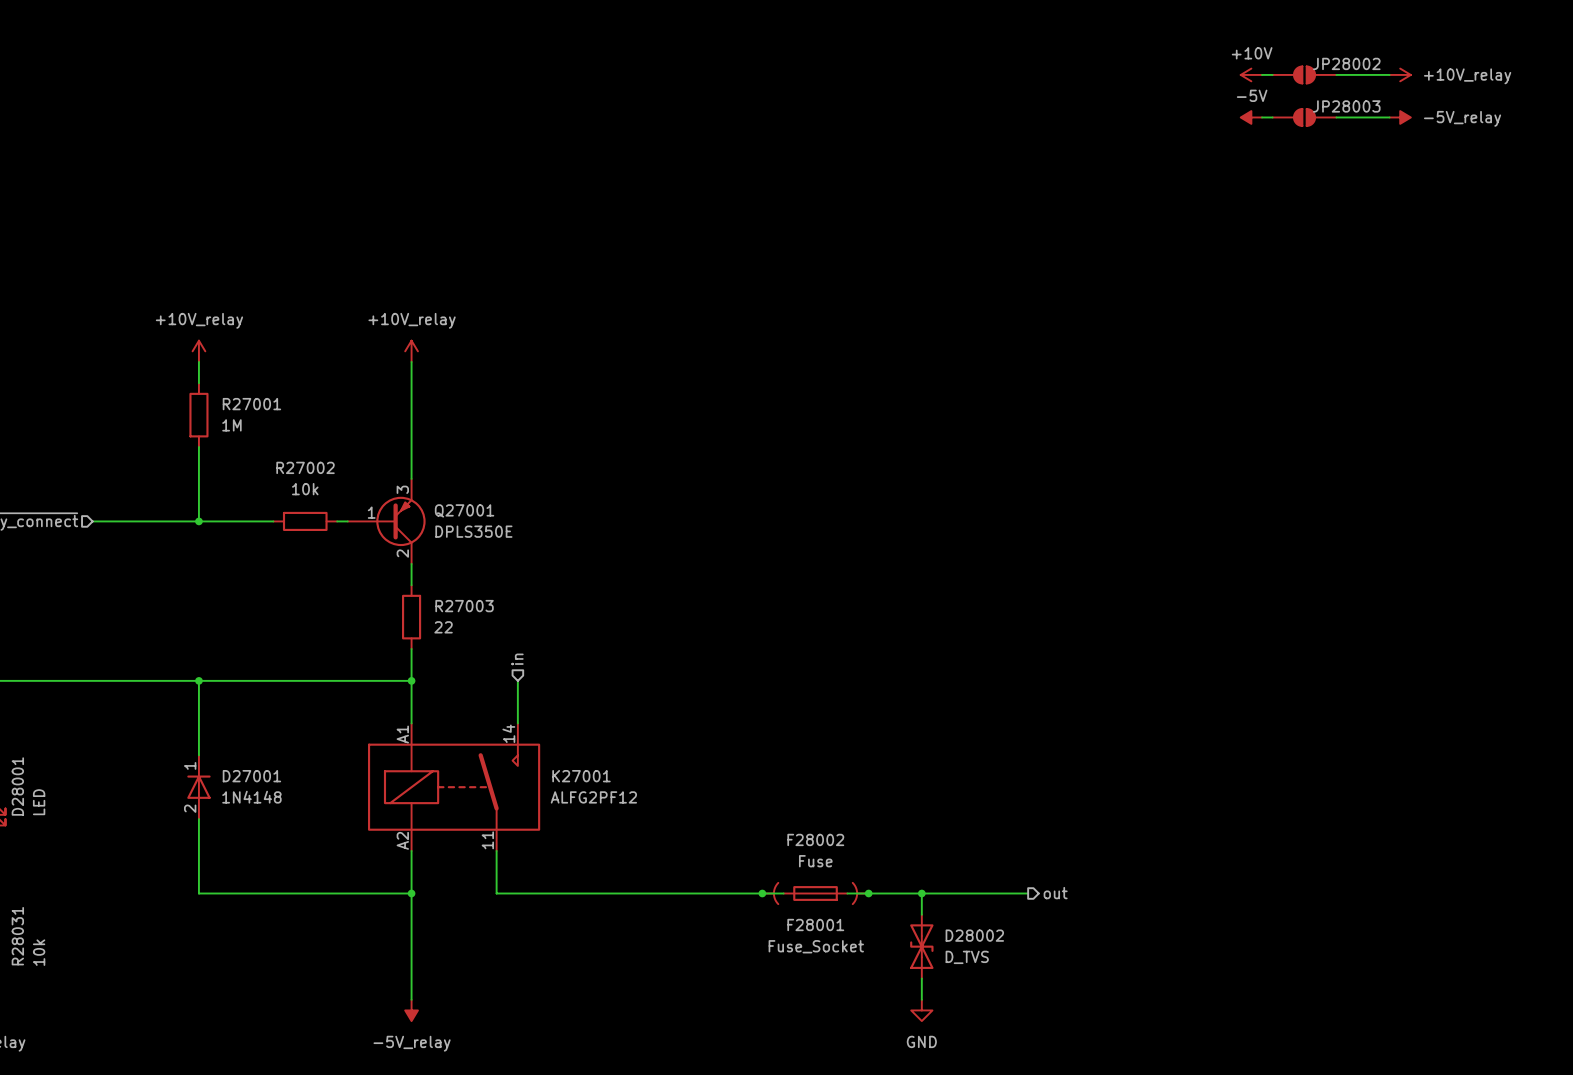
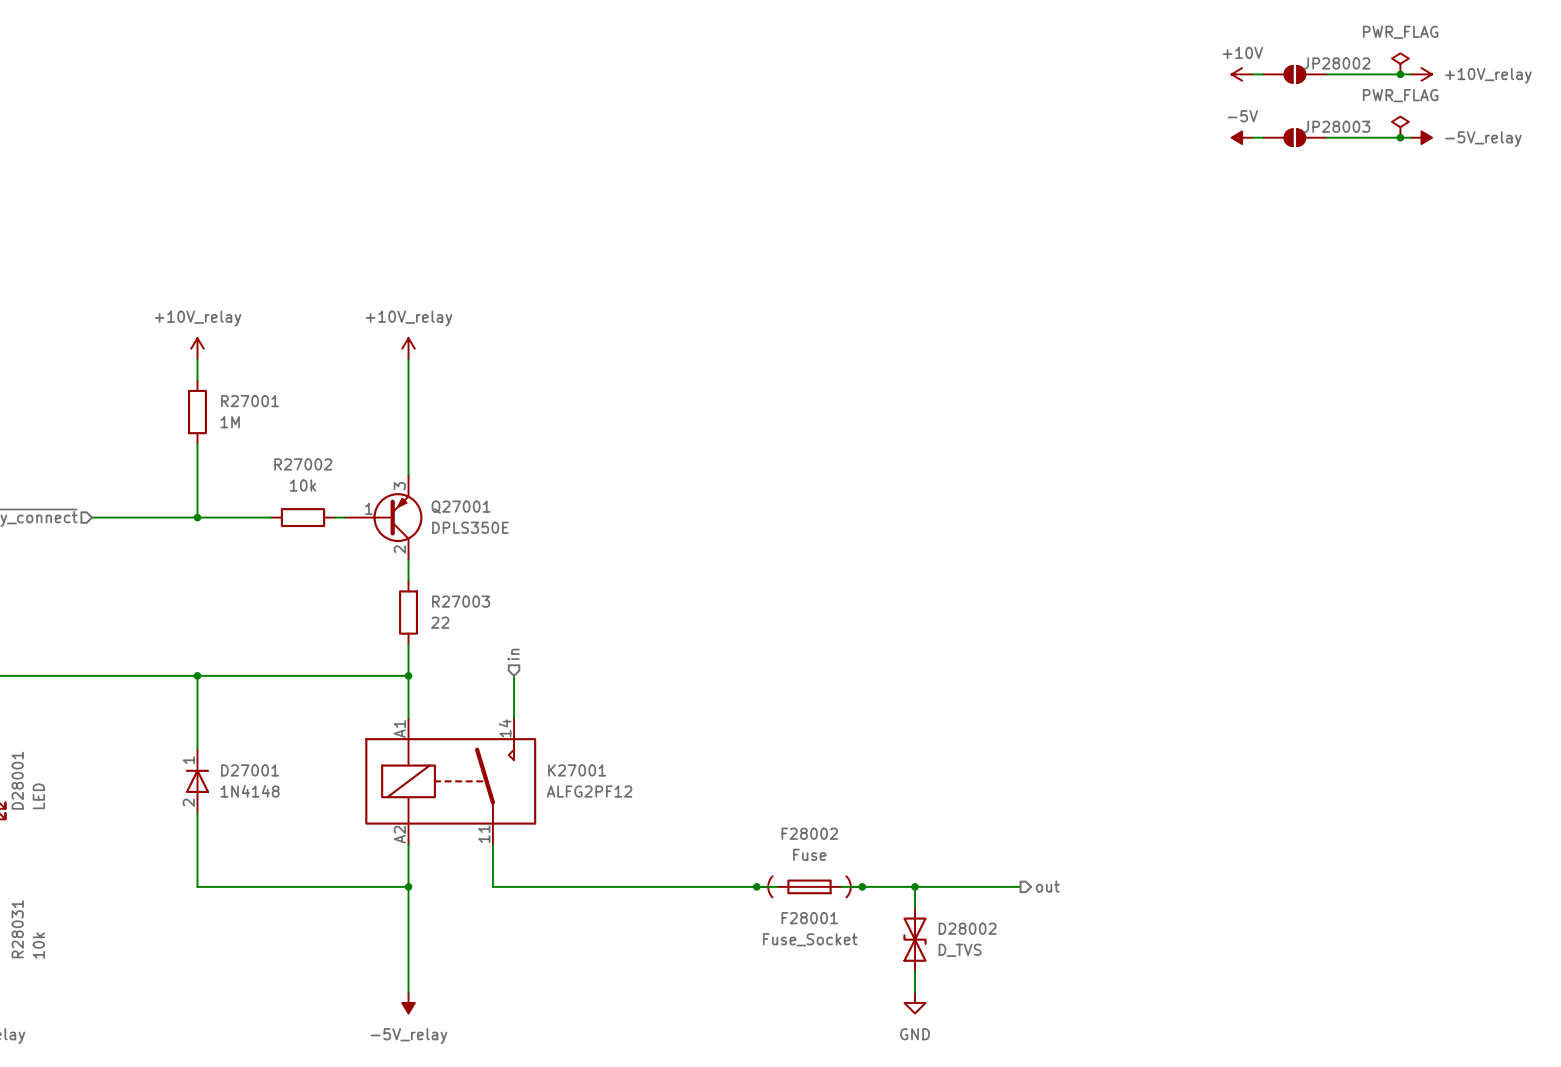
power symbol: none -> PWR_FLAG (1400, 63)
power symbol position: +10V_relay (1400, 74) -> +10V_relay (1421, 74)
junction: none -> (1400, 74)
power symbol position: -5V (1251, 117) -> -5V (1242, 137)
wire: (1262, 117) (1272, 117) -> (1252, 137) (1263, 137)
JP28003 position: (1304, 117) -> (1294, 137)
wire: (1336, 117) (1389, 117) -> none
power symbol position: -5V_relay (1400, 117) -> -5V_relay (1421, 137)
power symbol: none -> PWR_FLAG (1400, 127)
wire: none -> (1326, 137) (1410, 137)
junction: none -> (1400, 137)

